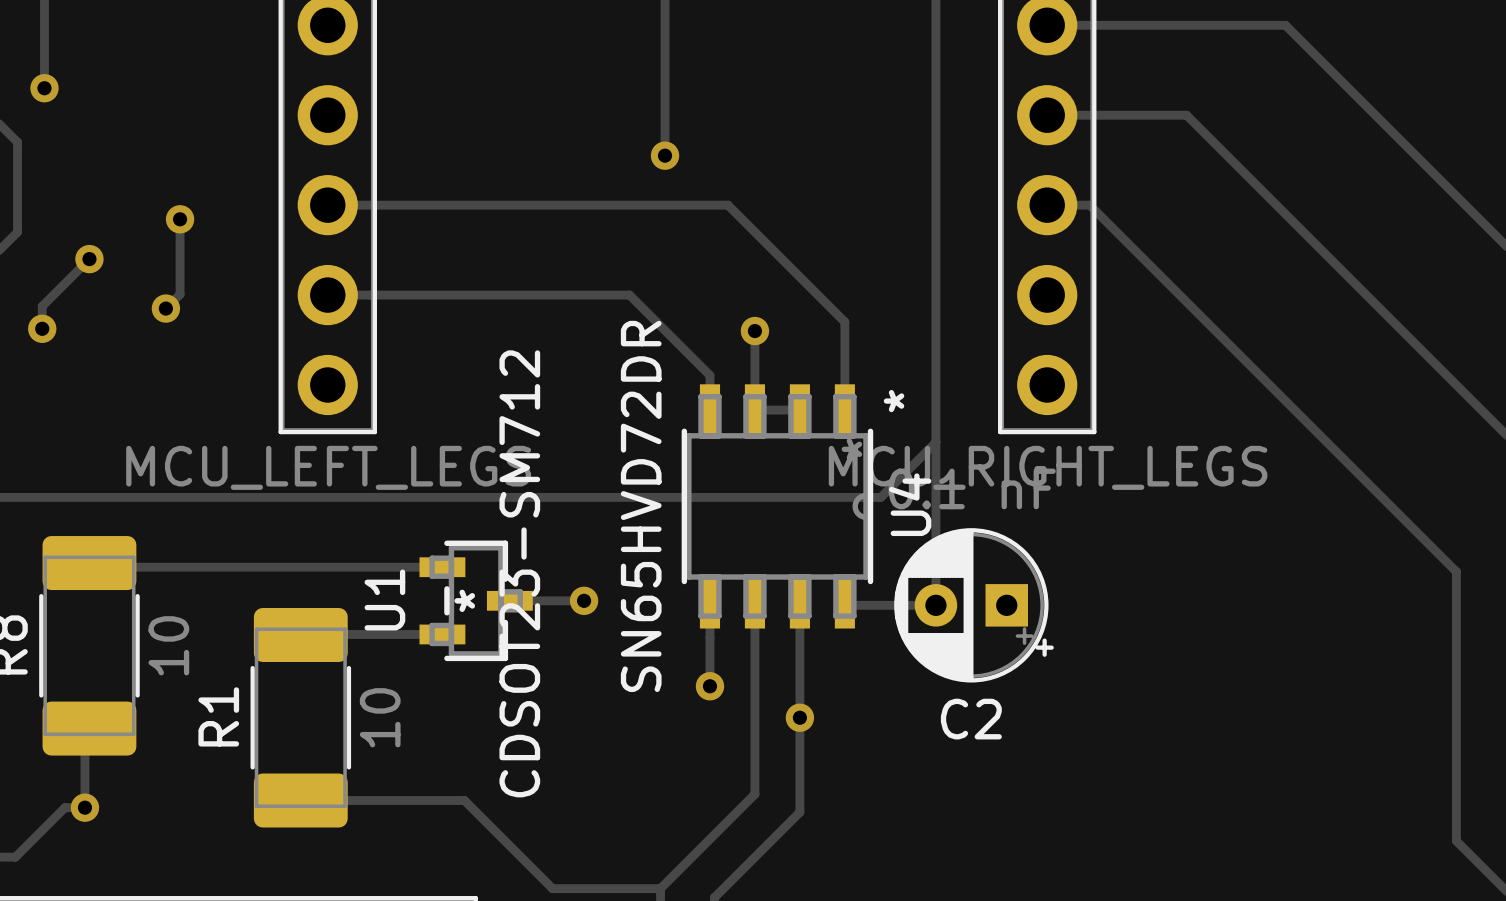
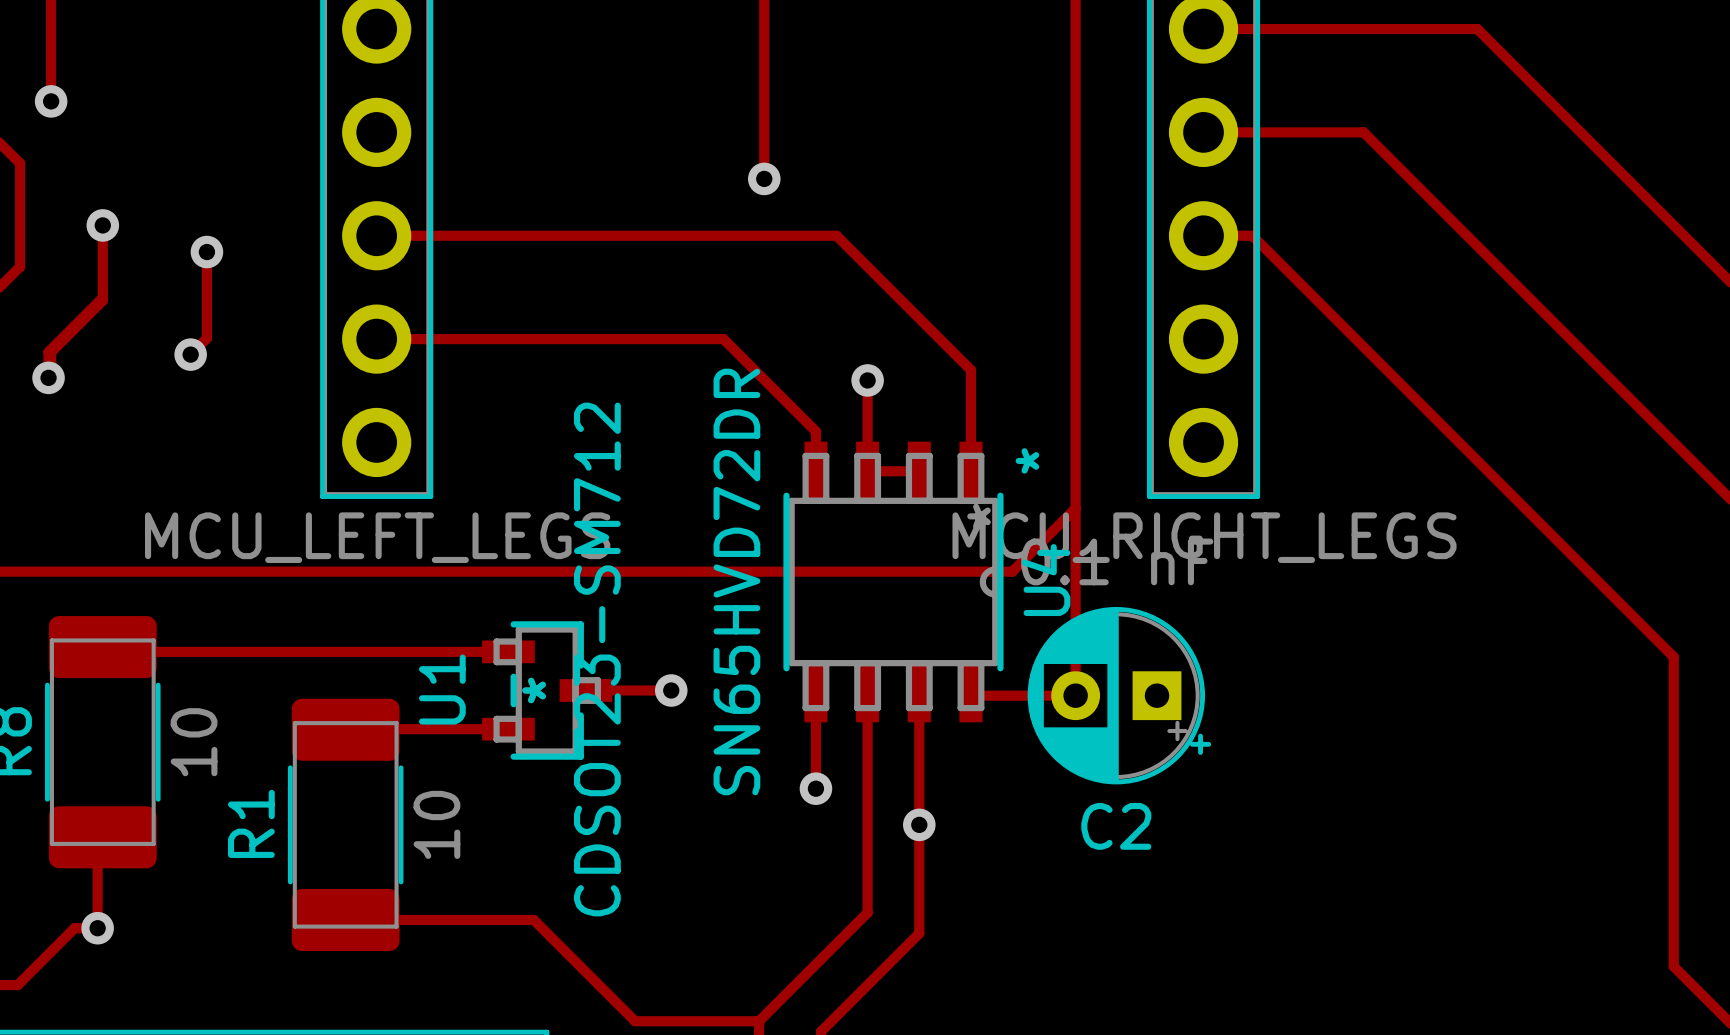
track: none -> (102, 225) (102, 300) (51, 352) (51, 375)
via position: (89, 259) -> (102, 225)

